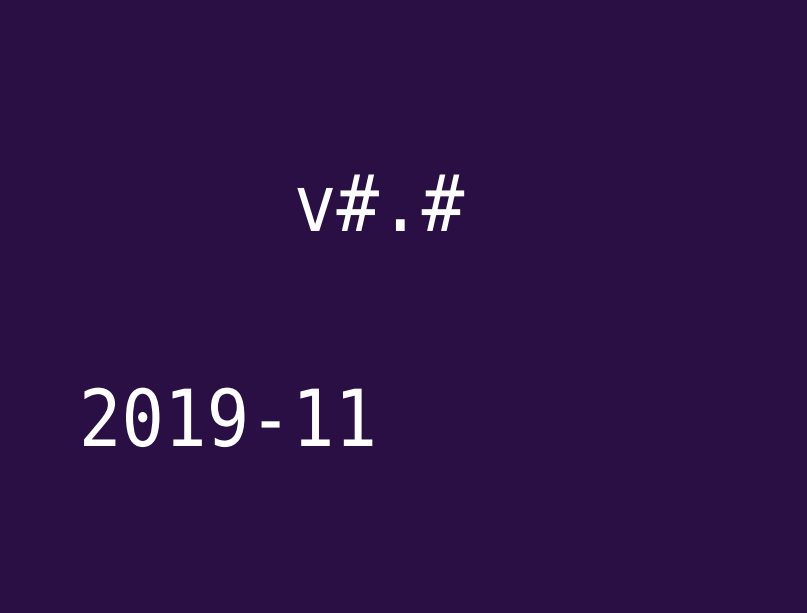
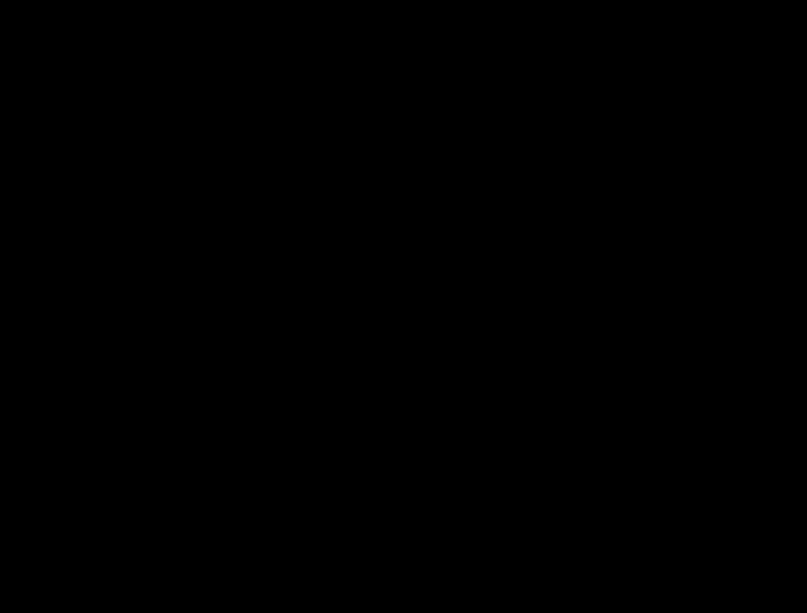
text: v#.# (380, 202) -> none
text: 2019-11 (228, 417) -> none

